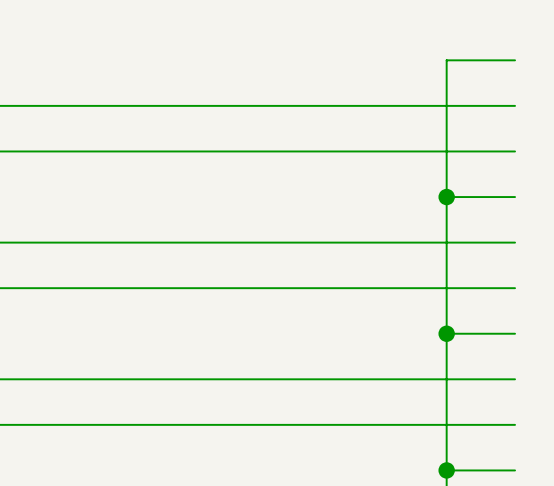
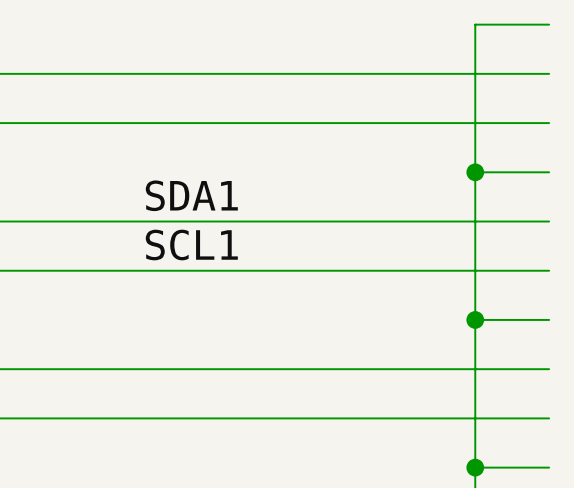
label: none -> SDA1 (191, 195)
label: none -> SCL1 (191, 245)

